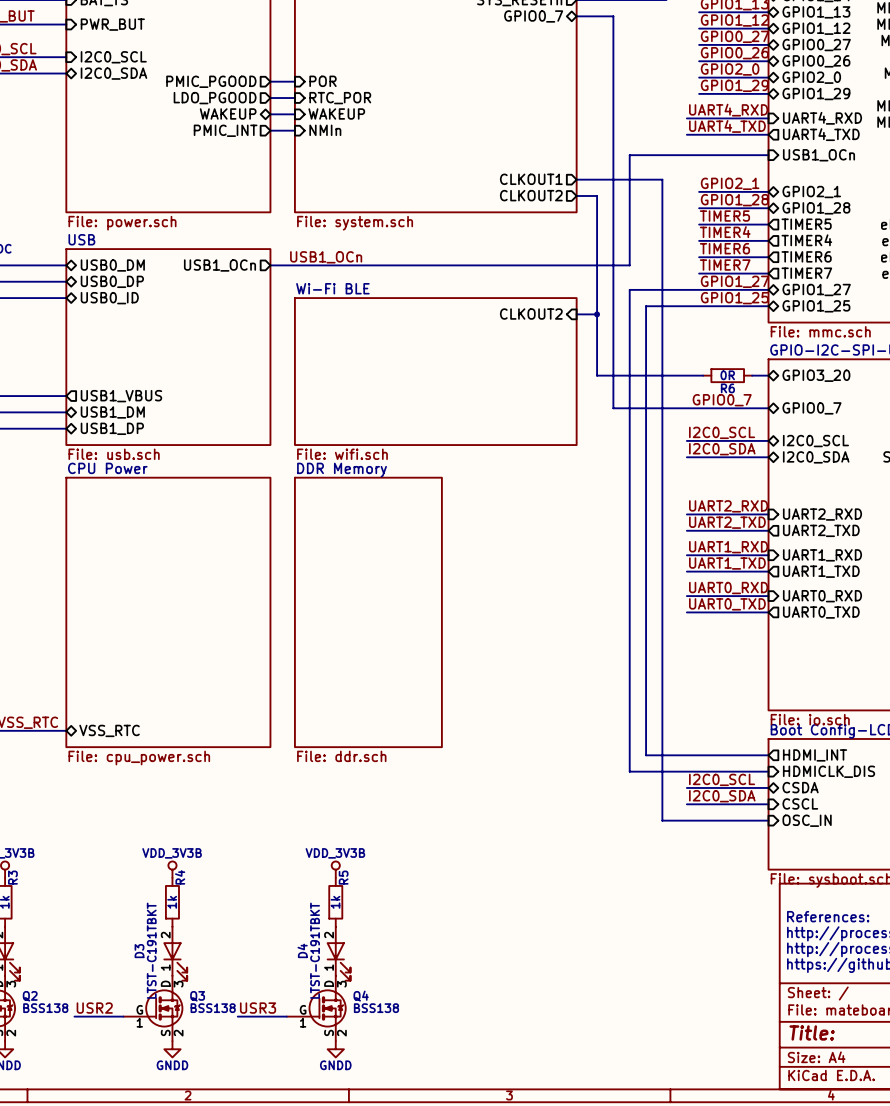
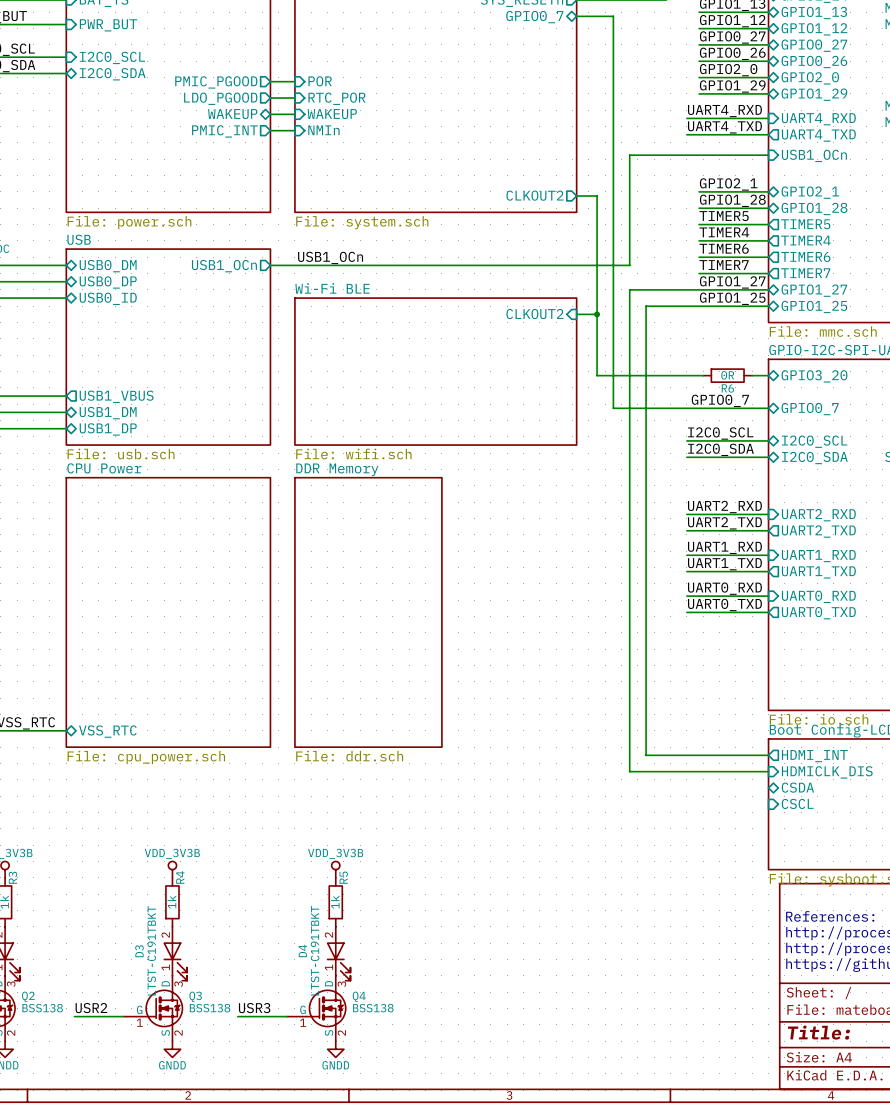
sheet pin: CLKOUT1 (531, 179) -> none
wire: (576, 179) (662, 179) (662, 820) (768, 820) -> none
label: I2C0_SCL (722, 779) -> none
wire: (686, 787) (768, 787) -> none
label: I2C0_SDA (722, 796) -> none
wire: (686, 804) (768, 804) -> none
sheet pin: OSC_IN (807, 820) -> none

